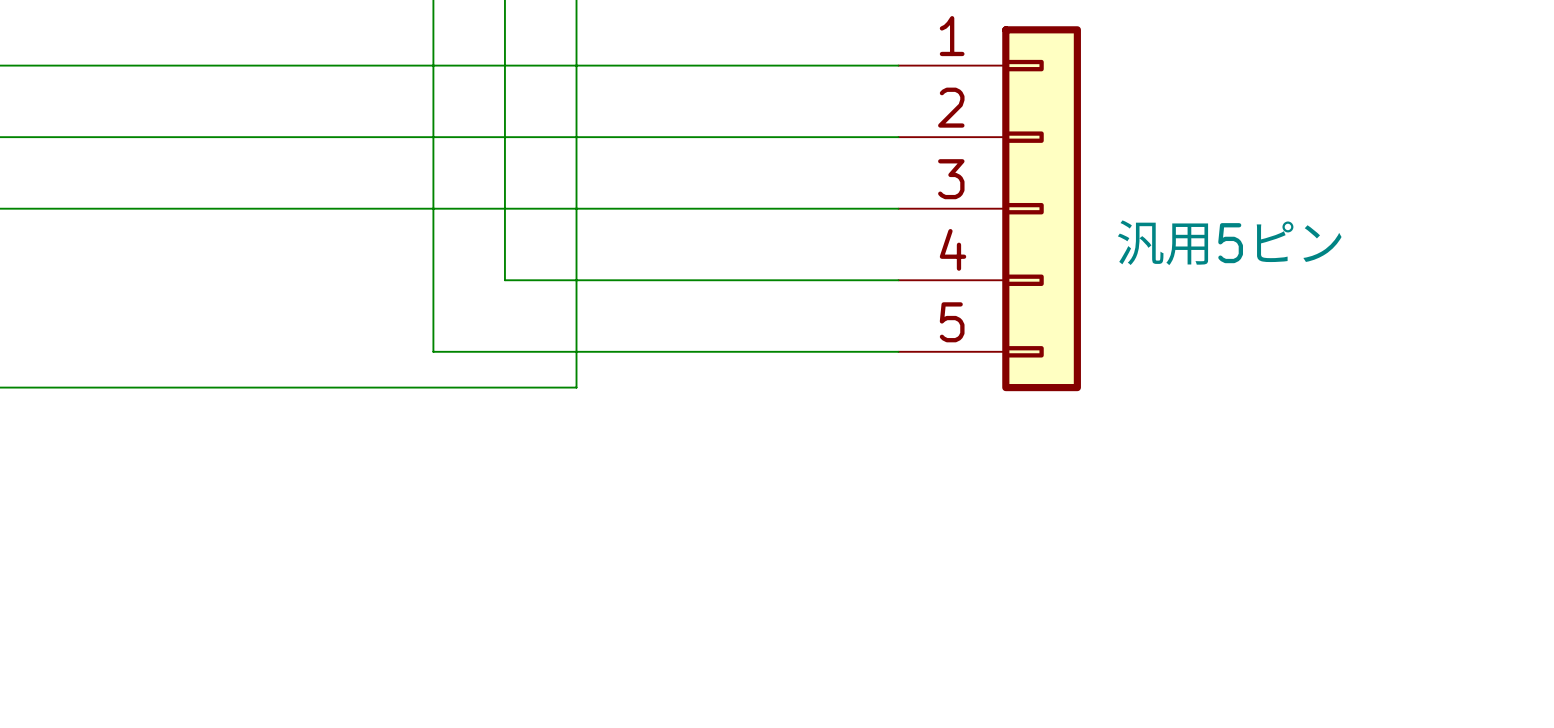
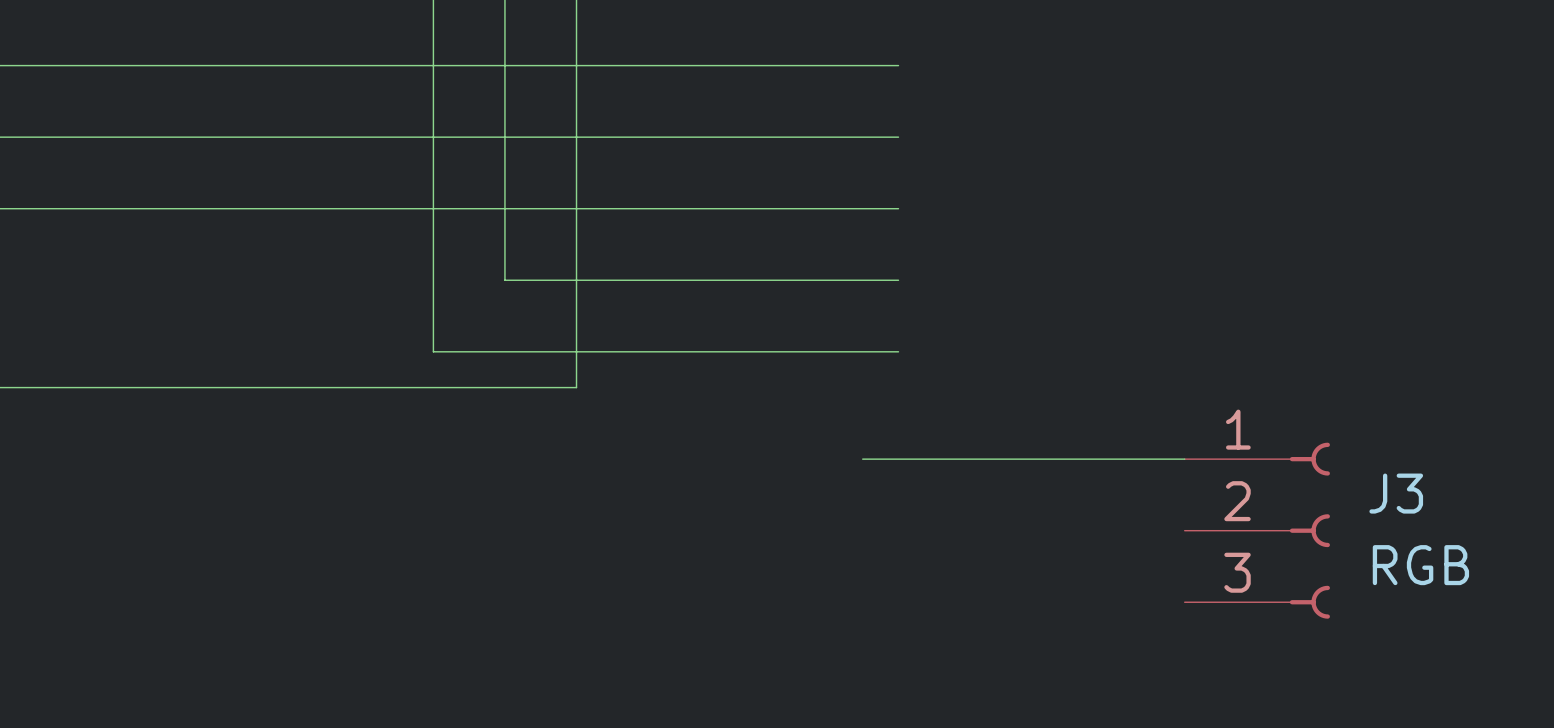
part: 汎用5ピン (989, 208) -> none
wire: none -> (862, 459) (1184, 459)
J3: none -> RGB (1257, 530)

